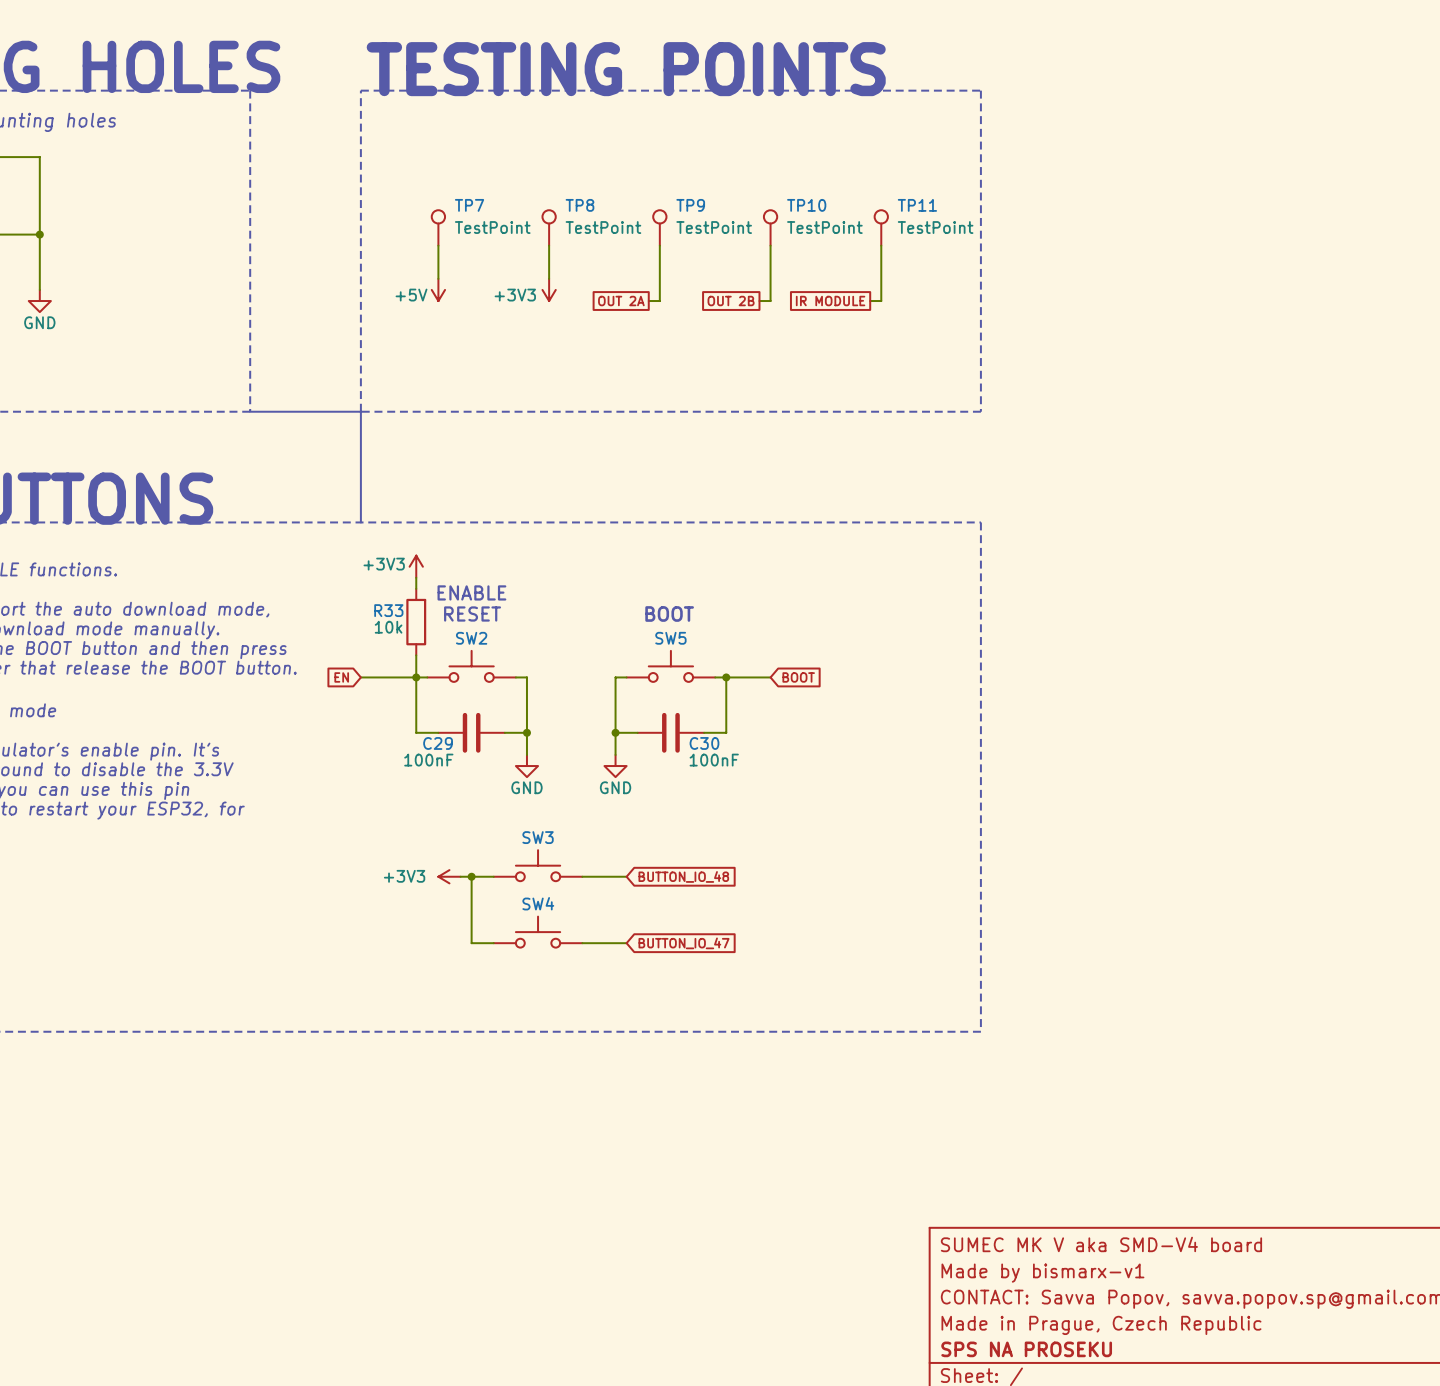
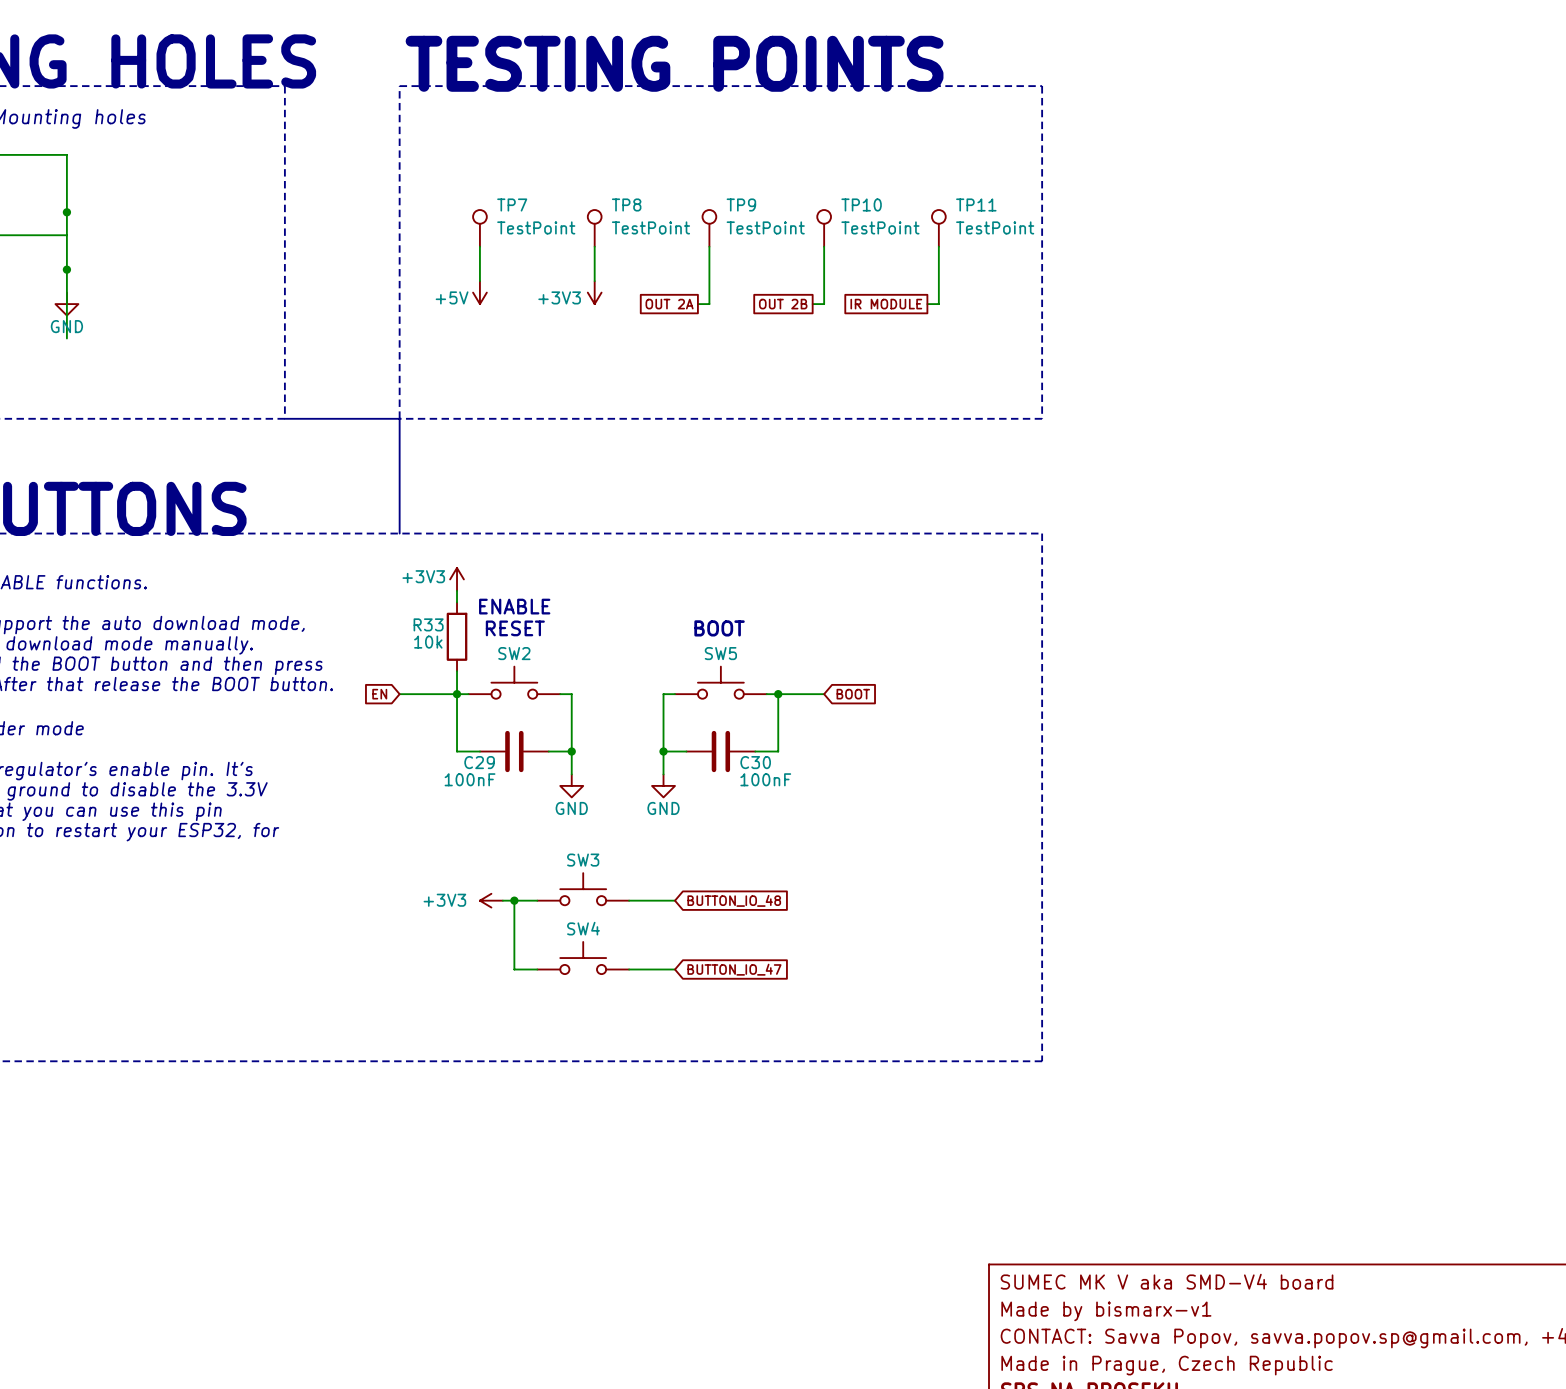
junction: none -> (66, 212)
junction: (39, 234) -> none
junction: none -> (66, 269)
wire: none -> (66, 292) (66, 338)

